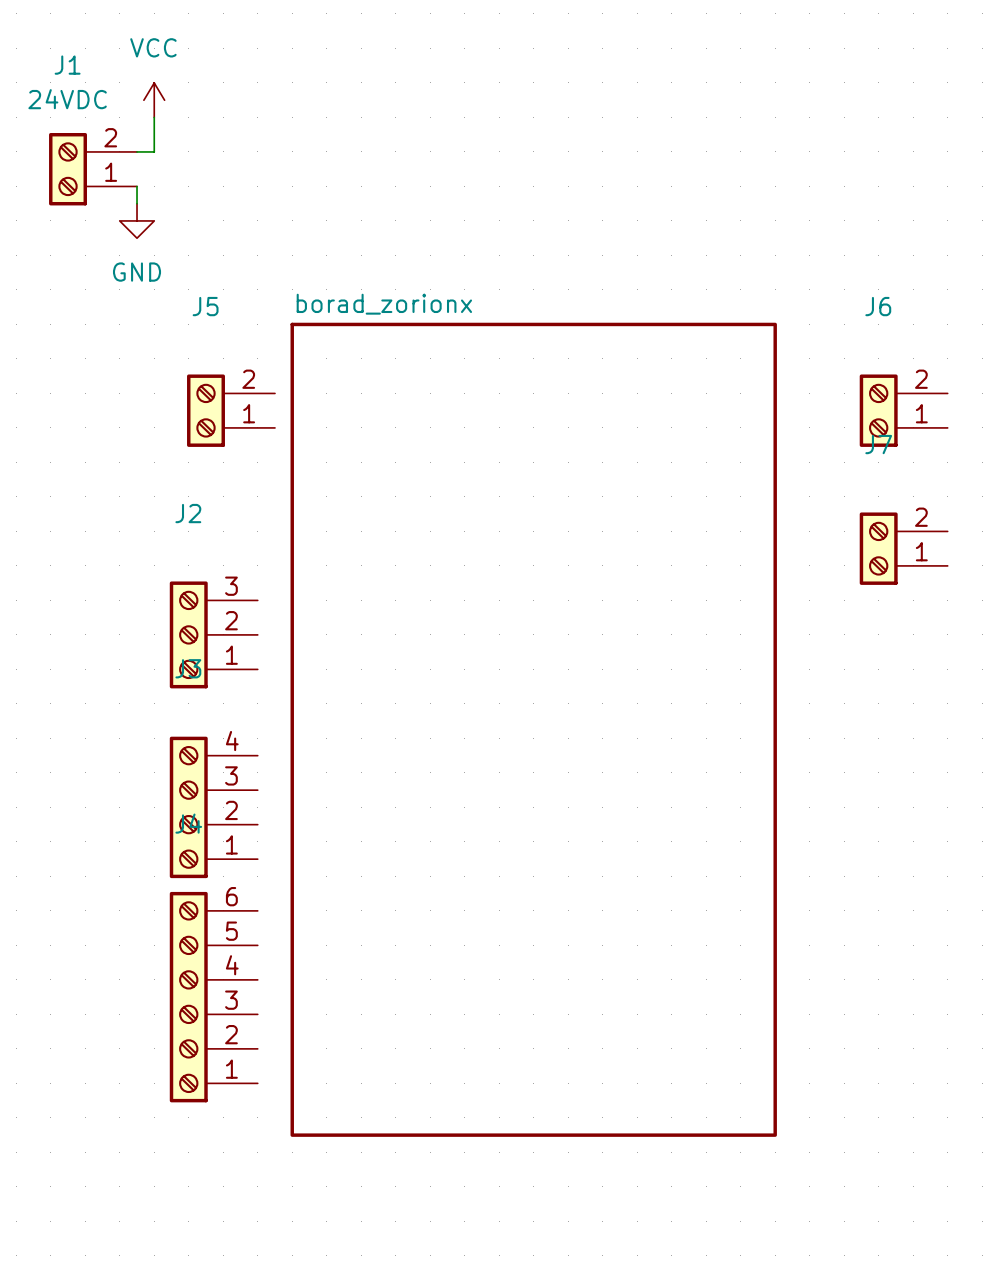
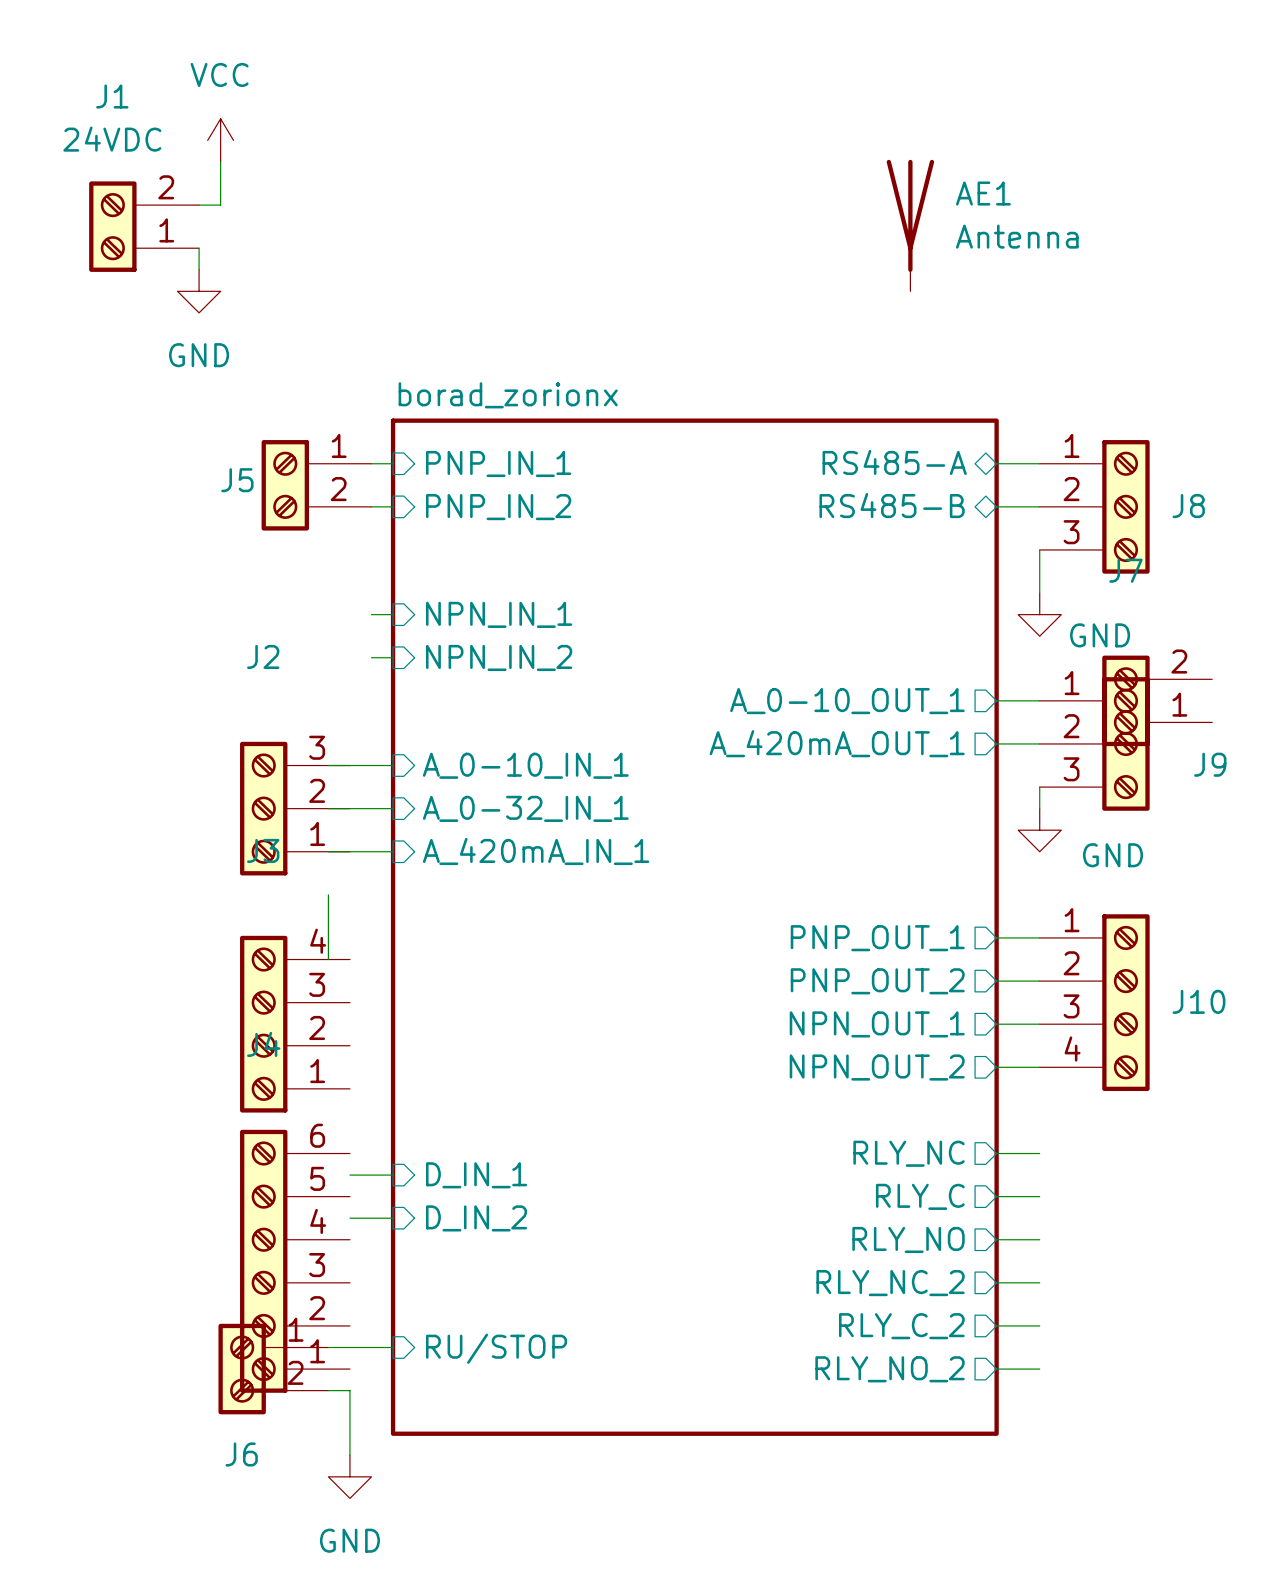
AE1: none -> Antenna (910, 225)
J5 name position: J5 (205, 306) -> J5 (237, 480)
J6 name position: J6 (878, 306) -> J6 (241, 1454)
sheet pin: none -> RS485-A (894, 462)
wire: none -> (371, 463) (393, 463)
wire: none -> (996, 463) (1039, 463)
sheet pin: none -> PNP_IN_1 (498, 463)
sheet pin: none -> RS485-B (892, 505)
wire: none -> (371, 506) (393, 506)
sheet pin: none -> PNP_IN_2 (498, 507)
wire: none -> (996, 506) (1039, 506)
J8: none -> (1094, 506)
J5 flip: as is (206, 410) -> up-down (285, 485)
J6 flip: as is (878, 410) -> up-down (242, 1369)
J6 position: (903, 410) -> (273, 1369)
wire: none -> (1039, 549) (1039, 593)
wire: none -> (371, 614) (393, 614)
sheet pin: none -> NPN_IN_1 (499, 614)
power symbol: none -> GND (1039, 614)
wire: none -> (371, 657) (393, 657)
sheet pin: none -> NPN_IN_2 (499, 657)
sheet pin: none -> A_0-10_OUT_1 (847, 701)
wire: none -> (996, 700) (1039, 700)
sheet pin: none -> A_420mA_OUT_1 (837, 743)
wire: none -> (996, 743) (1039, 743)
J9: none -> (1094, 743)
wire: none -> (328, 765) (393, 765)
sheet pin: none -> A_0-10_IN_1 (525, 765)
wire: none -> (1039, 787) (1039, 808)
wire: none -> (328, 808) (393, 808)
sheet pin: none -> A_0-32_IN_1 (525, 808)
power symbol: none -> GND (1039, 830)
wire: none -> (328, 851) (393, 851)
sheet pin: none -> A_420mA_IN_1 (536, 851)
wire: none -> (328, 894) (328, 959)
sheet pin: none -> PNP_OUT_1 (877, 938)
wire: none -> (996, 937) (1039, 937)
wire: none -> (996, 981) (1039, 981)
sheet pin: none -> PNP_OUT_2 (877, 981)
J10: none -> (1094, 1002)
sheet pin: none -> NPN_OUT_1 (877, 1024)
wire: none -> (996, 1024) (1039, 1024)
wire: none -> (996, 1067) (1039, 1067)
sheet pin: none -> NPN_OUT_2 (877, 1067)
wire: none -> (996, 1153) (1039, 1153)
sheet pin: none -> RLY_NC (909, 1153)
wire: none -> (349, 1175) (393, 1175)
sheet pin: none -> D_IN_1 (476, 1175)
sheet pin: none -> RLY_C (920, 1196)
wire: none -> (996, 1196) (1039, 1196)
wire: none -> (349, 1218) (393, 1218)
sheet pin: none -> D_IN_2 (476, 1218)
wire: none -> (996, 1239) (1039, 1239)
sheet pin: none -> RLY_NO (908, 1239)
sheet pin: none -> RLY_NC_2 (890, 1283)
wire: none -> (996, 1282) (1039, 1282)
wire: none -> (996, 1325) (1039, 1325)
sheet pin: none -> RLY_C_2 (901, 1326)
wire: none -> (328, 1347) (393, 1347)
sheet pin: none -> RU/STOP (496, 1348)
sheet pin: none -> RLY_NO_2 (890, 1369)
wire: none -> (996, 1369) (1039, 1369)
wire: none -> (328, 1390) (349, 1390) (349, 1455)
power symbol: none -> GND (349, 1476)

